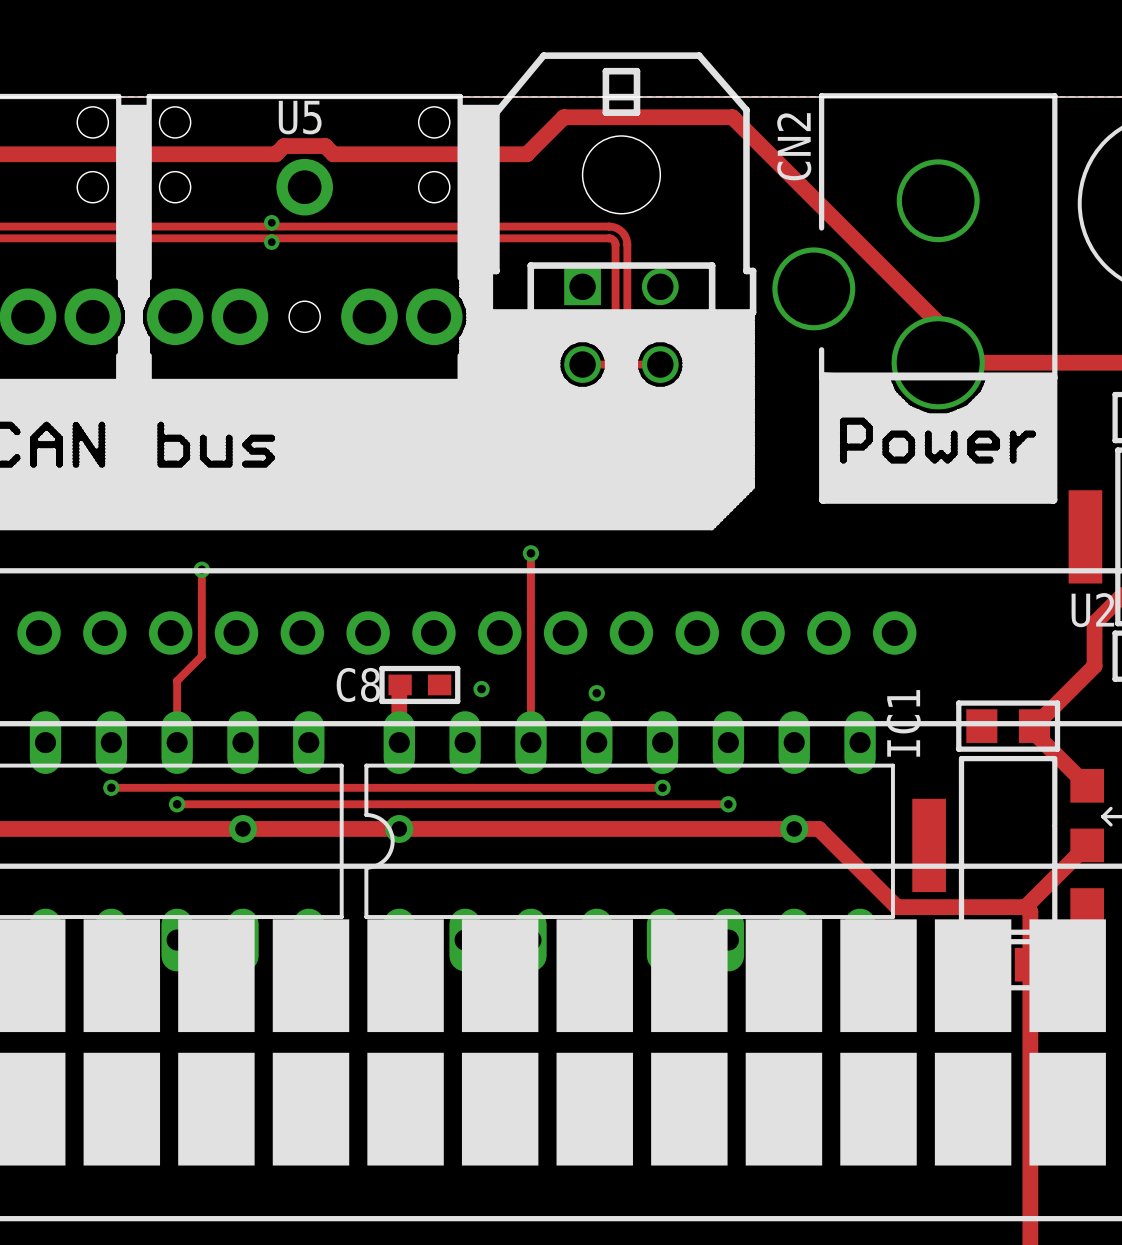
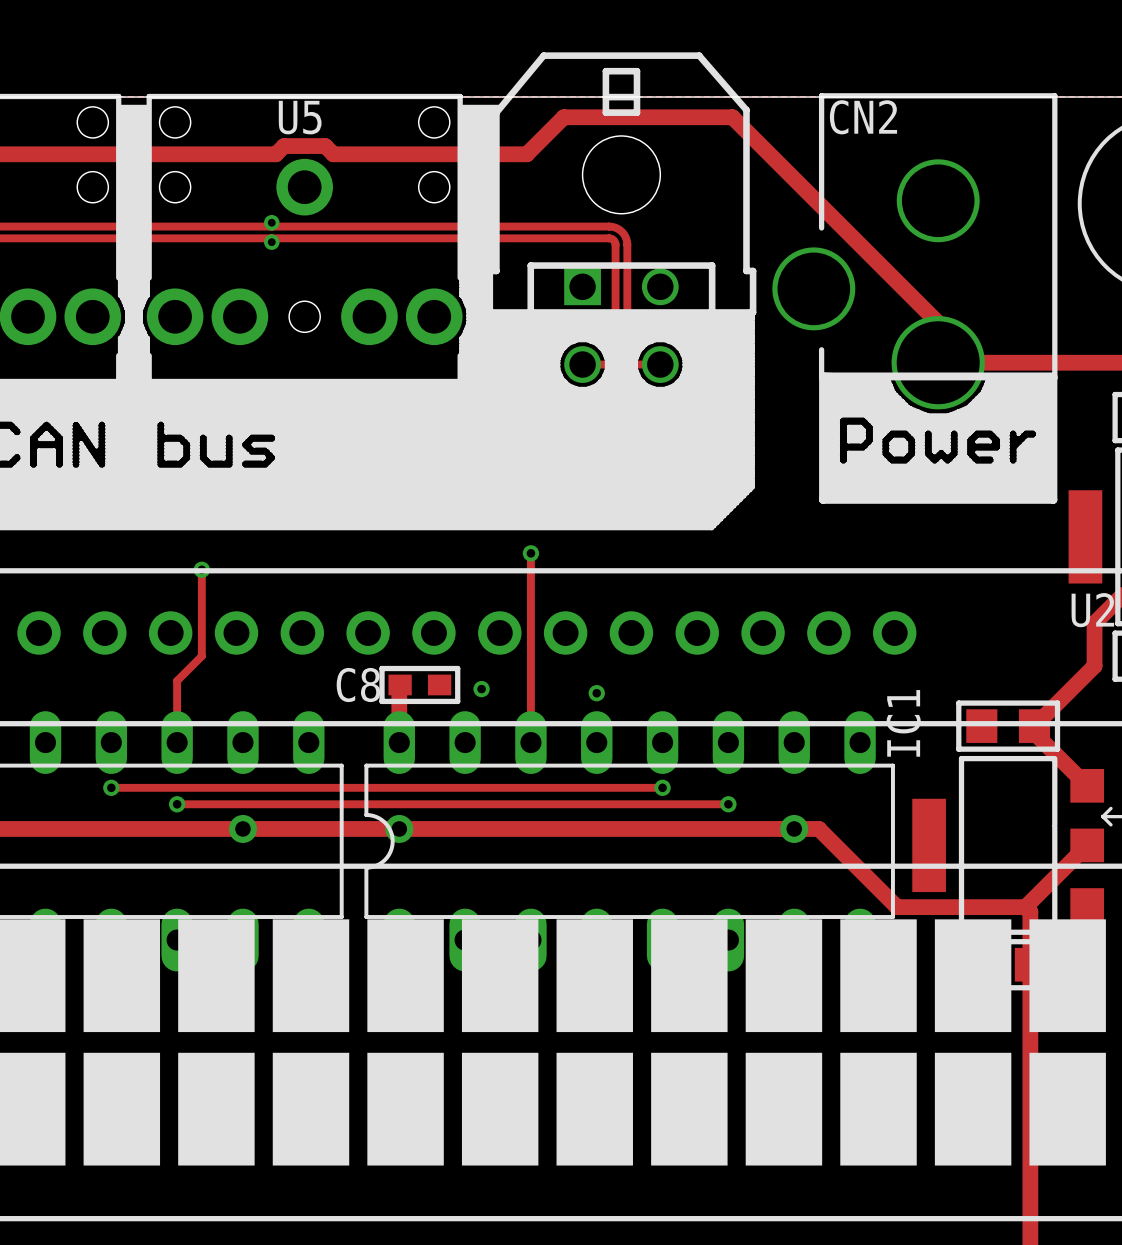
CN2 name rotation: 0° (794, 146) -> 90° clockwise (863, 117)

